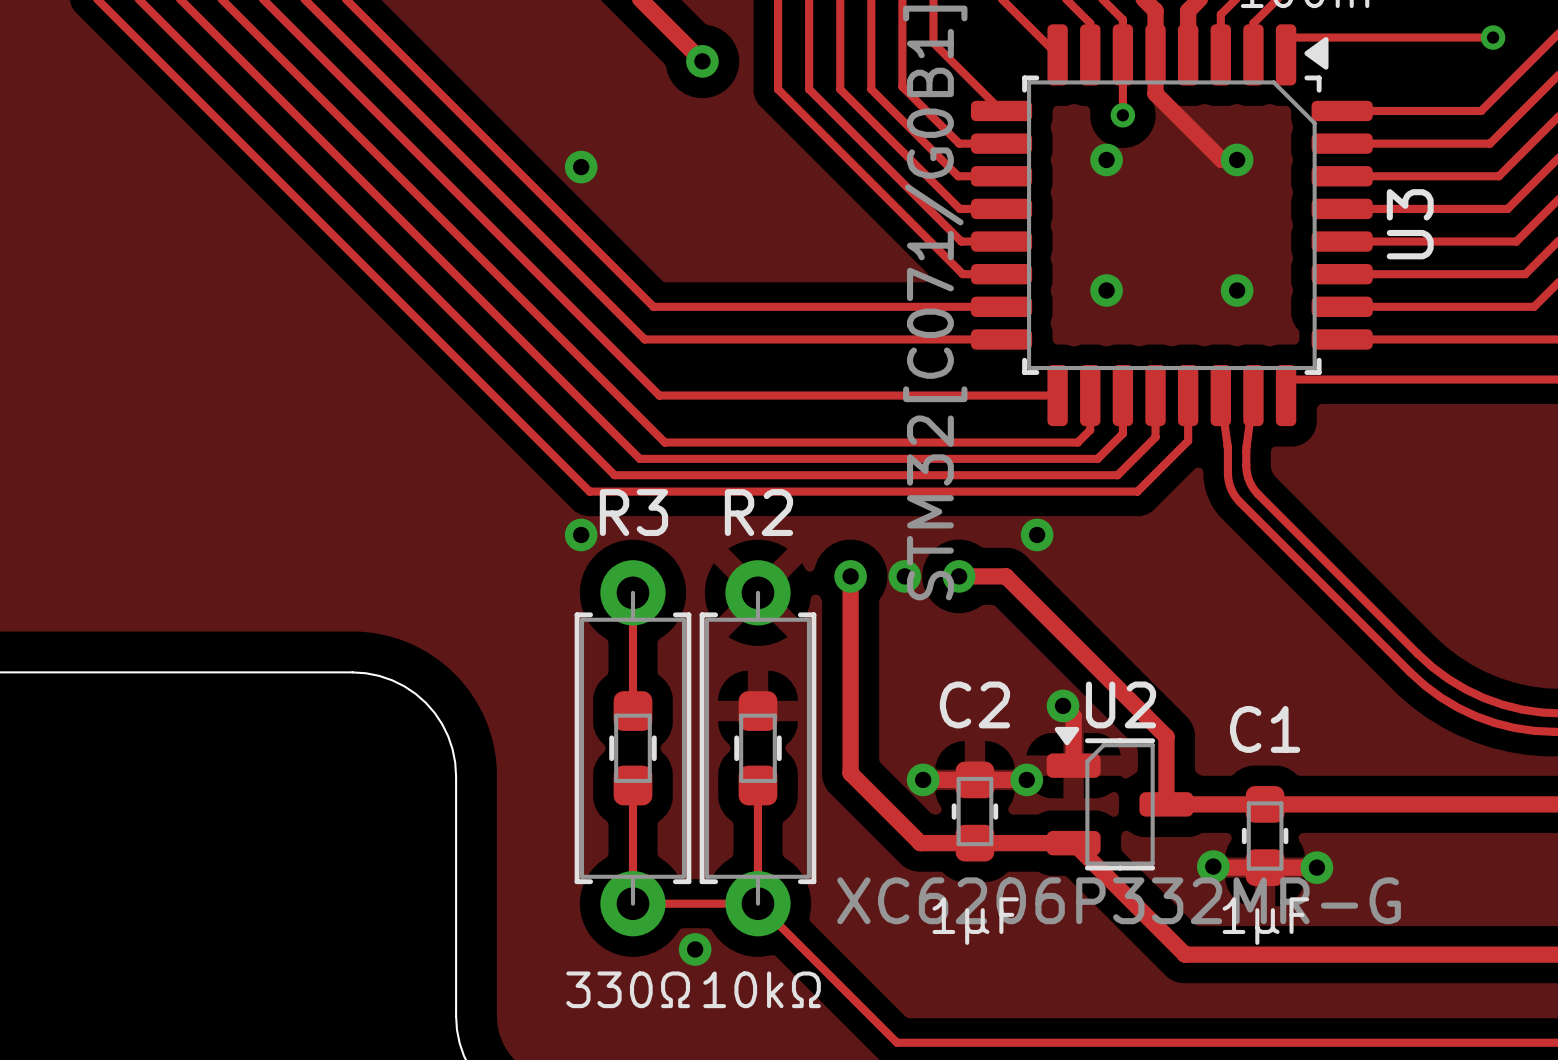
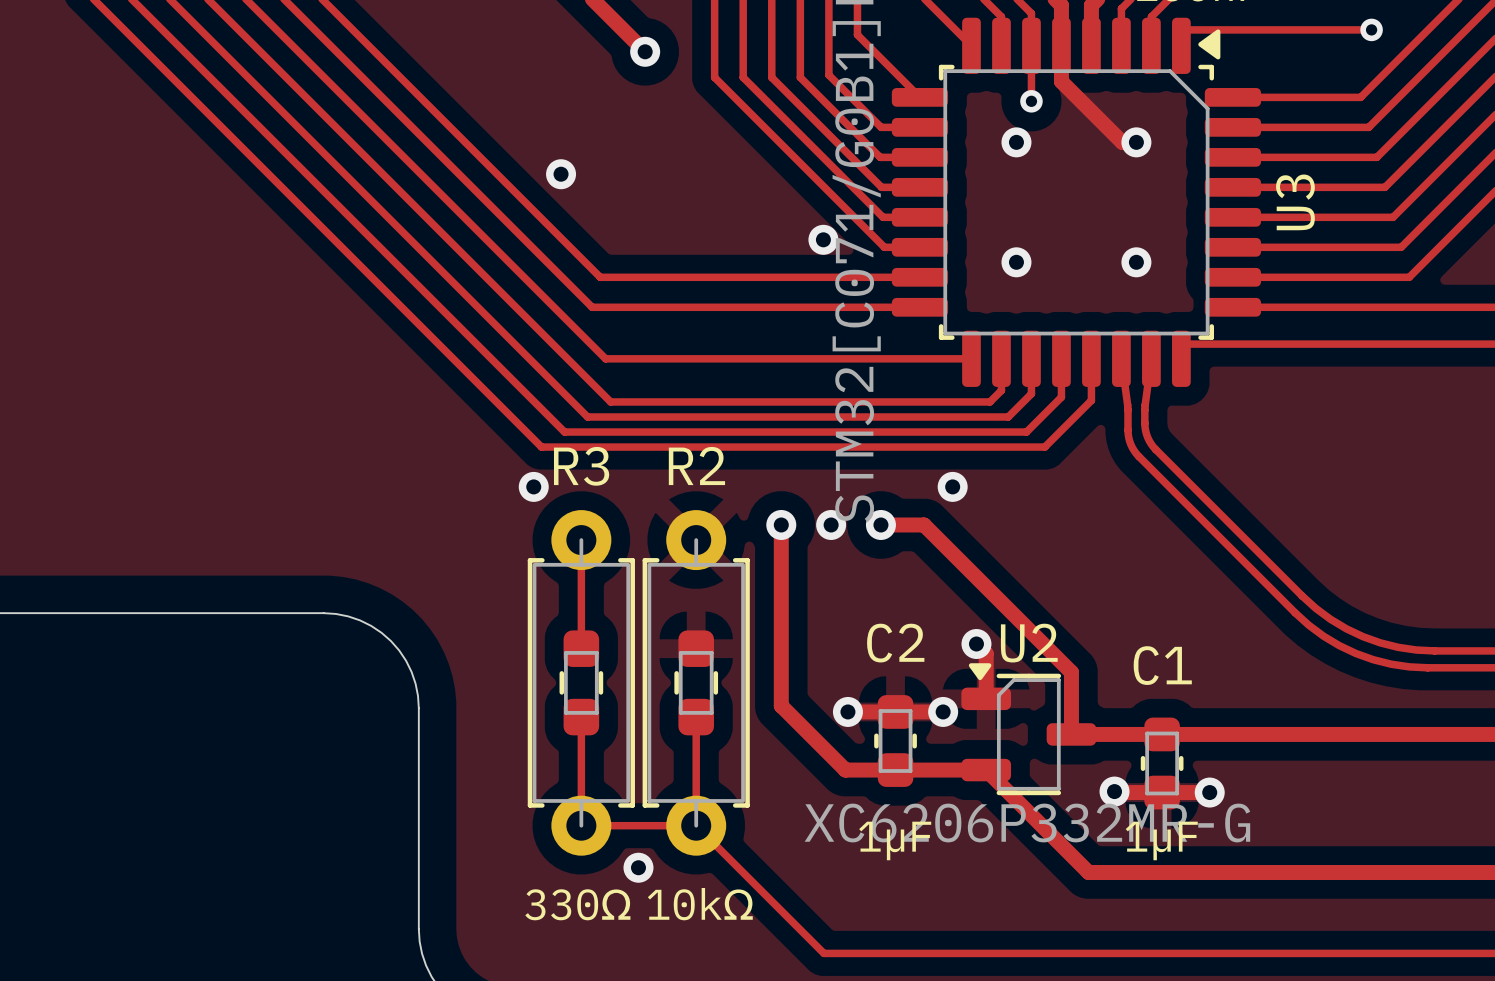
via position: (581, 167) -> (561, 174)
via: none -> (823, 239)

